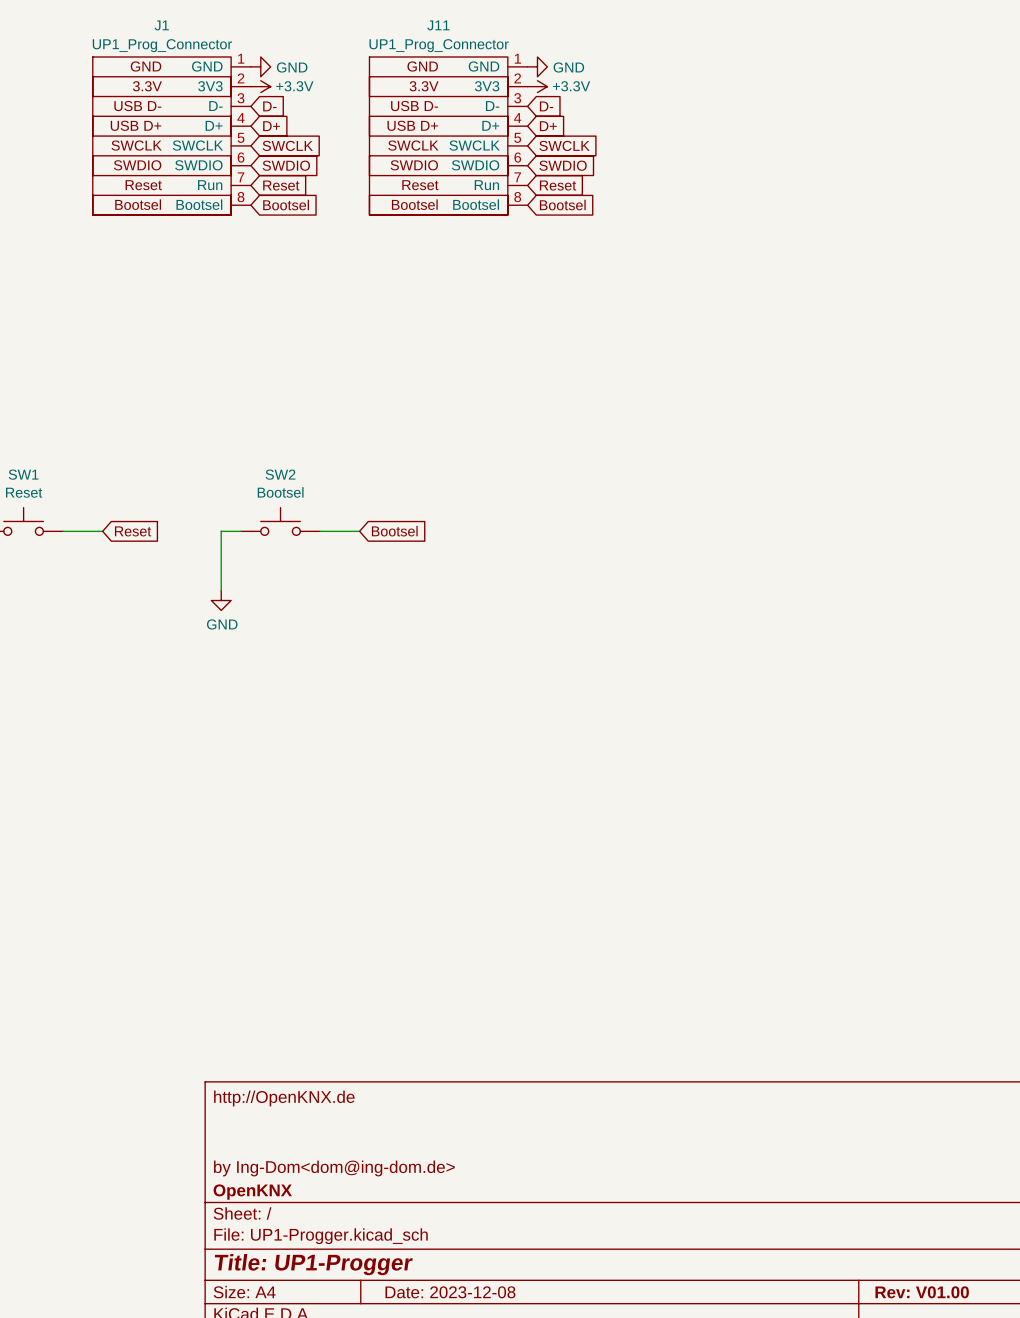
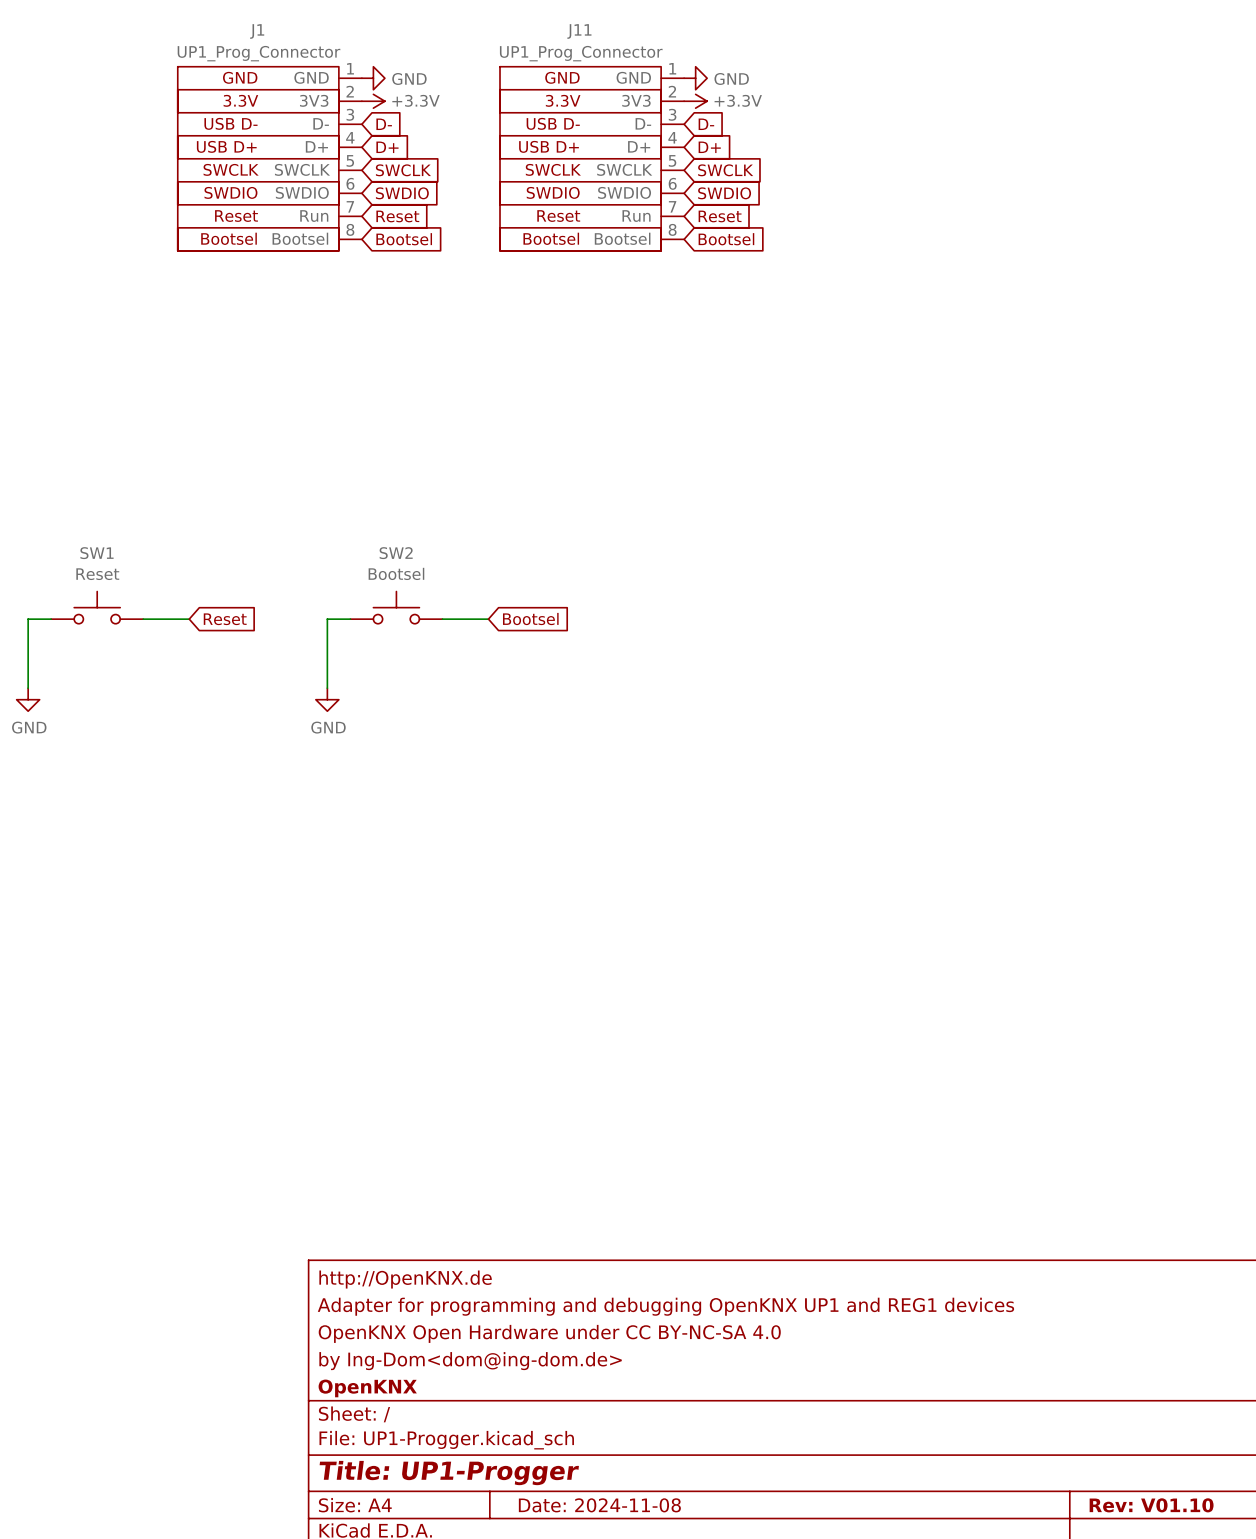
title block: none -> Adapter for programming and debugging OpenKNX UP1 and REG1 devices (665, 1306)
title block: none -> OpenKNX Open Hardware under CC BY-NC-SA 4.0 (549, 1333)
title block: Date: 2023-12-08 (450, 1292) -> Date: 2024-11-08 (599, 1505)
title block: Rev: V01.00 (922, 1292) -> Rev: V01.10 (1151, 1505)

